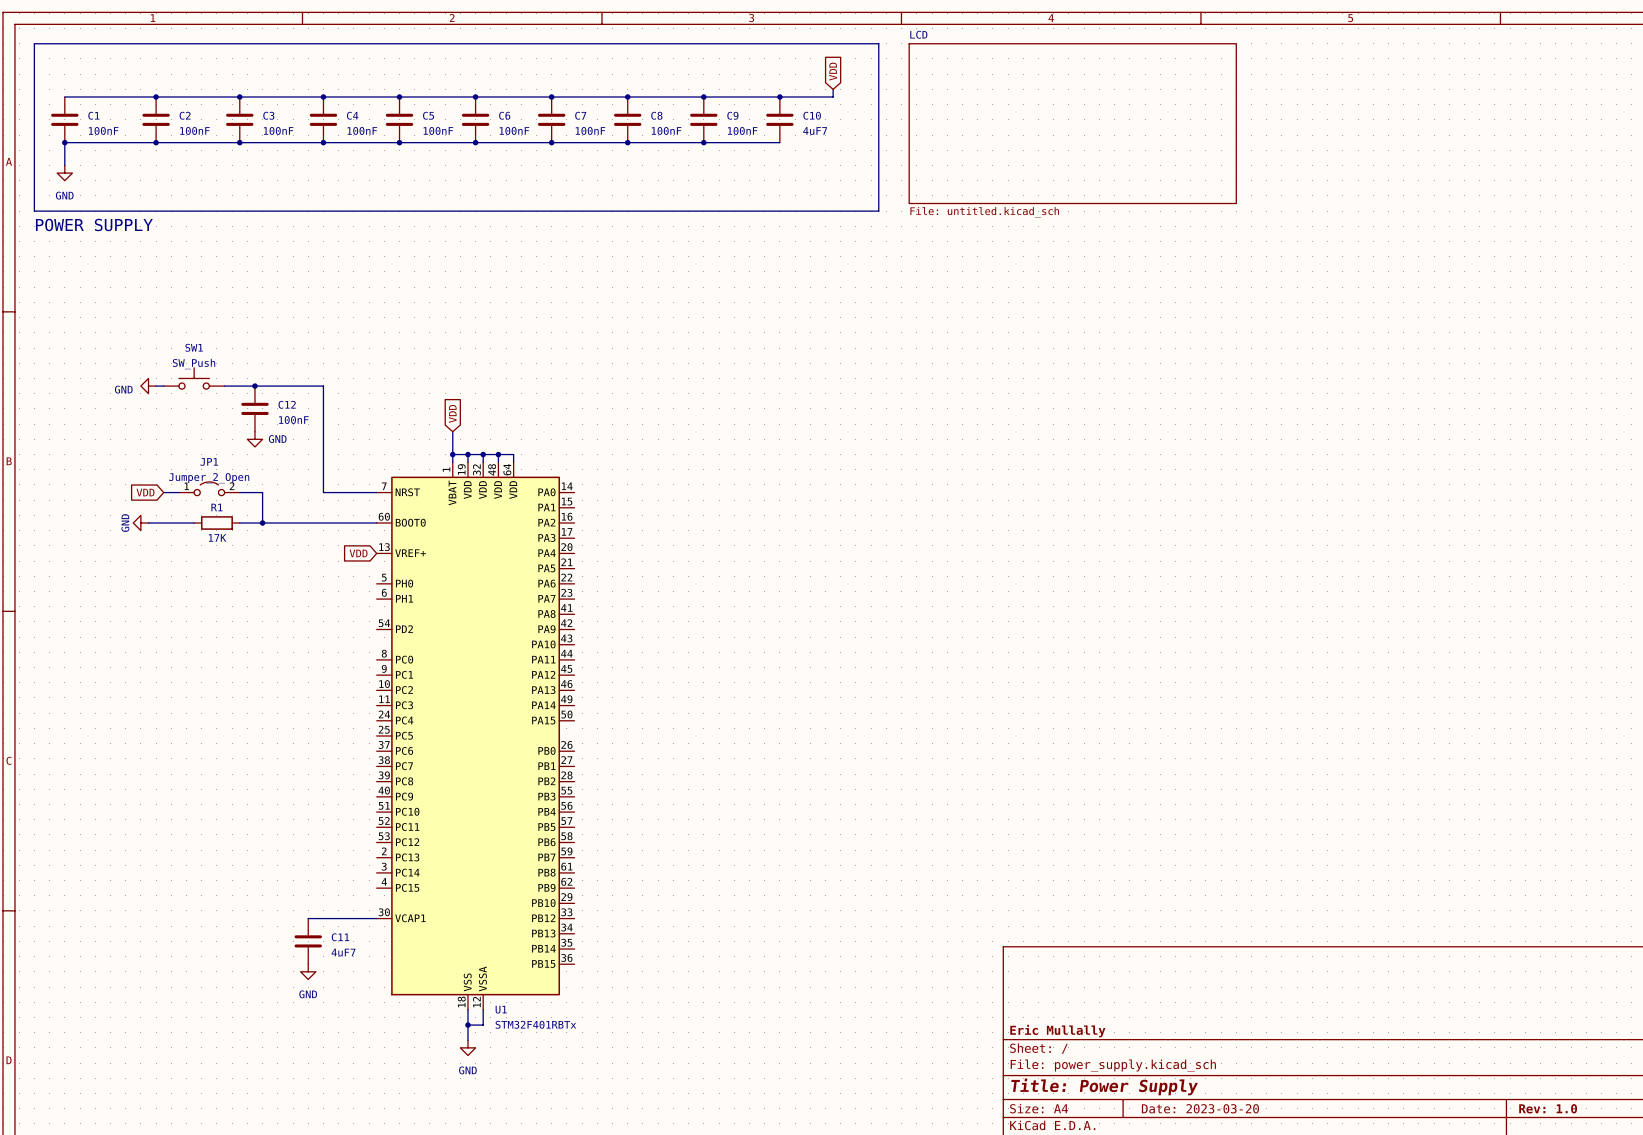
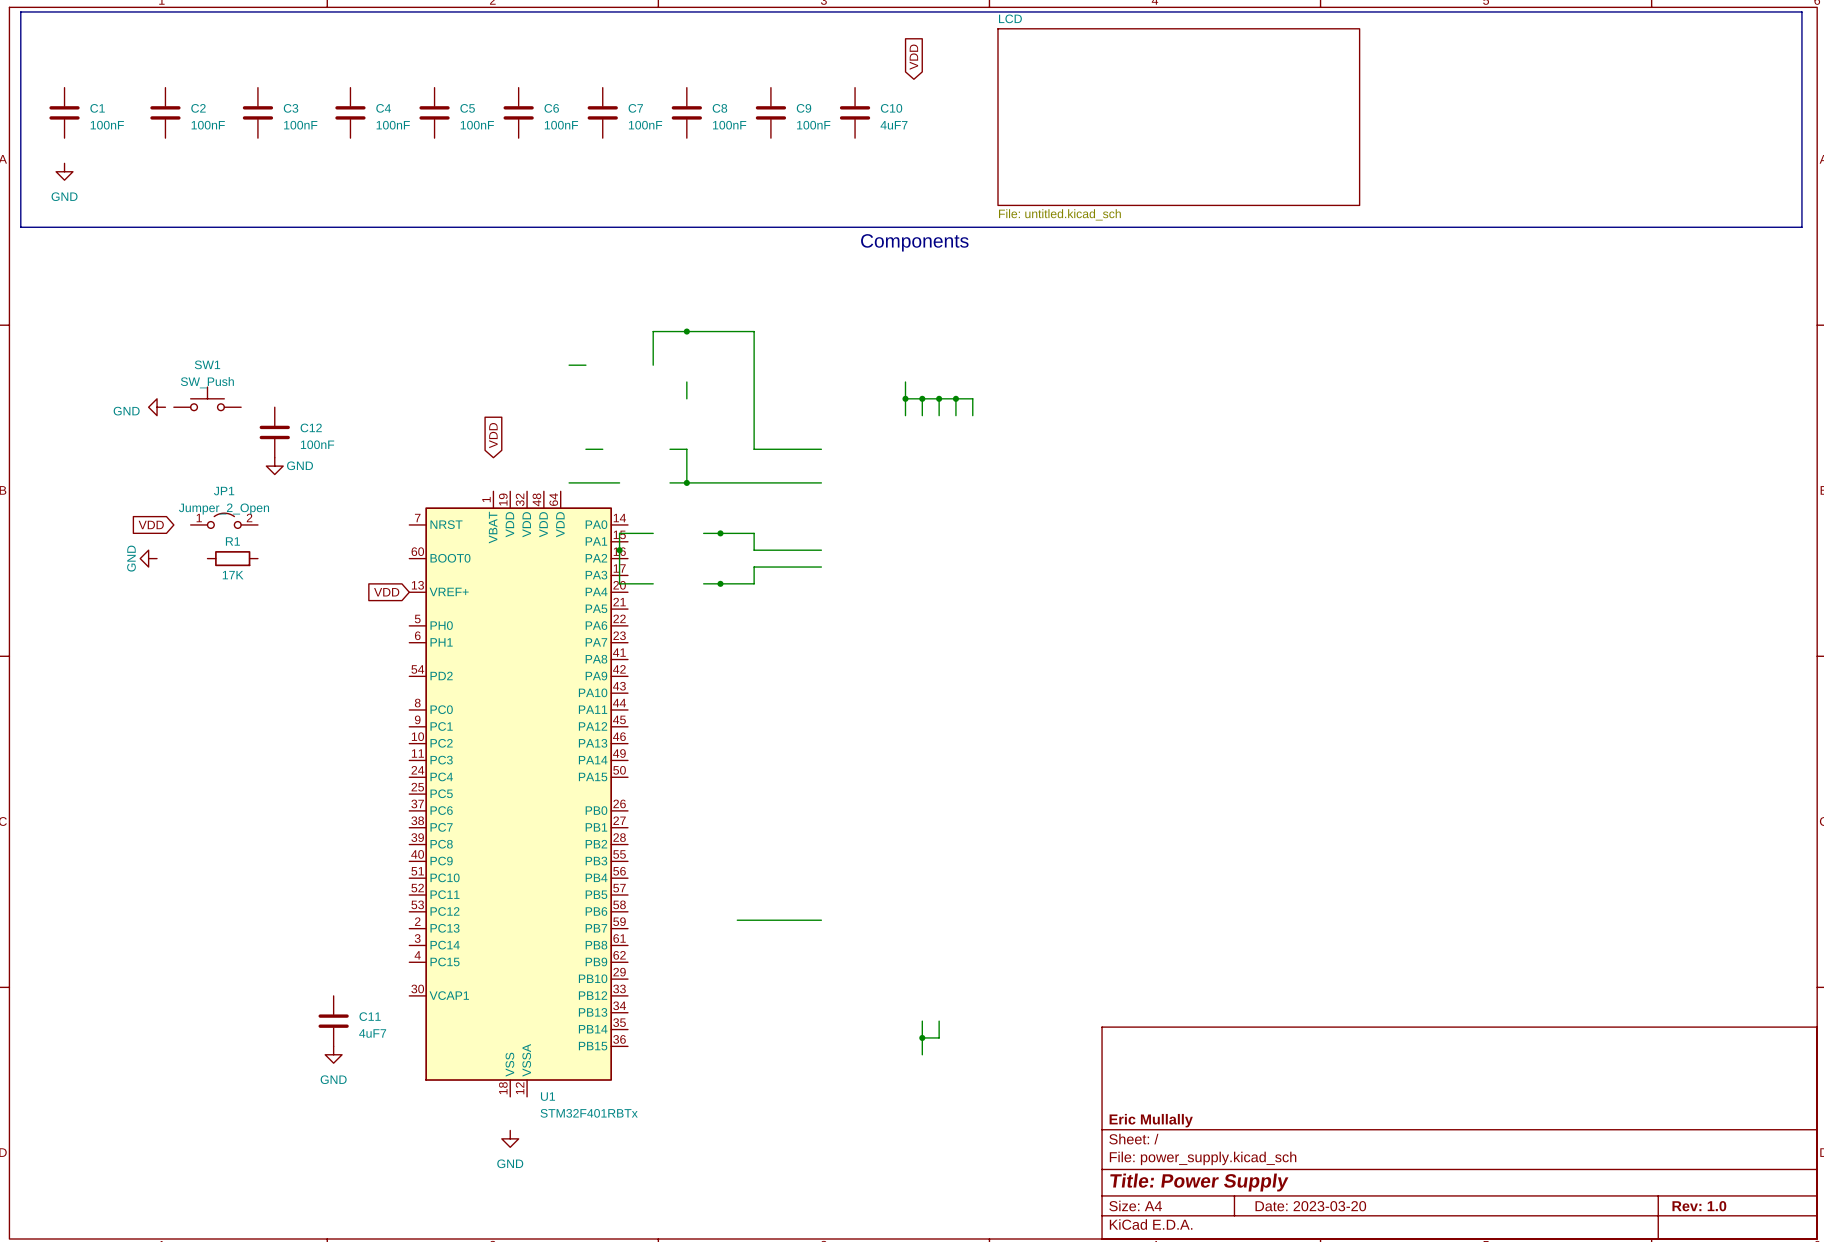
line: none -> (20, 11) (1801, 11) (1801, 227) (20, 227) (20, 11)
line: (34, 43) (878, 43) (878, 211) (34, 211) (34, 43) -> none
wire: (833, 89) (833, 97) (64, 97) -> none
junction: (156, 97) -> none
junction: (239, 97) -> none
junction: (323, 97) -> none
junction: (399, 97) -> none
junction: (475, 97) -> none
junction: (551, 97) -> none
junction: (627, 97) -> none
junction: (703, 97) -> none
junction: (779, 97) -> none
junction: (64, 142) -> none
junction: (156, 142) -> none
junction: (239, 142) -> none
junction: (323, 142) -> none
junction: (399, 142) -> none
junction: (475, 142) -> none
junction: (551, 142) -> none
junction: (627, 142) -> none
junction: (703, 142) -> none
wire: (779, 142) (64, 142) (64, 165) -> none
text: POWER SUPPLY (94, 224) -> none
text: none -> Components (914, 242)
junction: none -> (686, 331)
wire: none -> (569, 365) (585, 365)
wire: none -> (653, 365) (653, 331) (754, 331) (754, 449) (821, 449)
wire: none -> (686, 382) (686, 398)
wire: none -> (905, 382) (905, 415)
wire: none -> (905, 398) (972, 398) (972, 415)
junction: none -> (905, 398)
wire: none -> (922, 398) (922, 415)
junction: none -> (922, 398)
wire: none -> (939, 398) (939, 415)
junction: none -> (939, 398)
wire: none -> (955, 398) (955, 415)
junction: none -> (955, 398)
wire: (156, 386) (163, 386) -> none
wire: (224, 386) (323, 386) (323, 492) (376, 492) -> none
junction: (254, 386) -> none
wire: none -> (585, 449) (602, 449)
wire: none -> (670, 449) (686, 449) (686, 482)
wire: (452, 431) (452, 462) -> none
wire: (452, 454) (513, 454) (513, 462) -> none
junction: (452, 454) -> none
wire: (467, 454) (467, 462) -> none
junction: (467, 454) -> none
wire: (483, 454) (483, 462) -> none
junction: (483, 454) -> none
wire: (498, 454) (498, 462) -> none
junction: (498, 454) -> none
wire: none -> (569, 482) (619, 482)
wire: none -> (670, 482) (821, 482)
junction: none -> (686, 482)
wire: (163, 492) (178, 492) -> none
wire: (239, 492) (262, 492) (262, 523) -> none
wire: none -> (653, 533) (619, 533) (619, 583) (653, 583)
wire: none -> (703, 533) (754, 533) (754, 550) (821, 550)
junction: none -> (720, 533)
junction: none -> (619, 550)
wire: (148, 523) (194, 523) -> none
wire: (239, 523) (376, 523) -> none
junction: (262, 523) -> none
wire: none -> (821, 567) (754, 567) (754, 583) (703, 583)
junction: none -> (720, 583)
wire: none -> (737, 920) (821, 920)
wire: (308, 918) (376, 918) -> none
wire: none -> (922, 1021) (922, 1054)
wire: none -> (939, 1021) (939, 1037) (922, 1037)
junction: none -> (922, 1037)
wire: (467, 1009) (467, 1040) -> none
wire: (483, 1009) (483, 1025) (467, 1025) -> none
junction: (467, 1025) -> none

